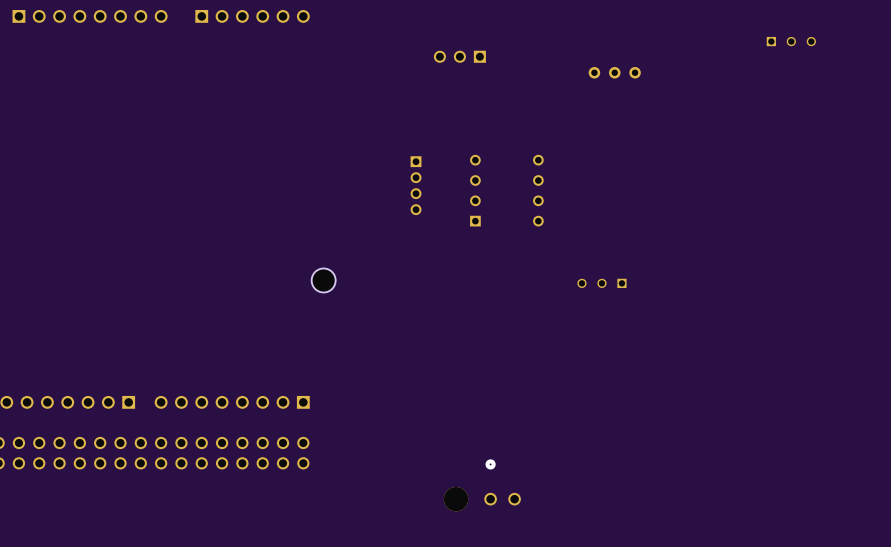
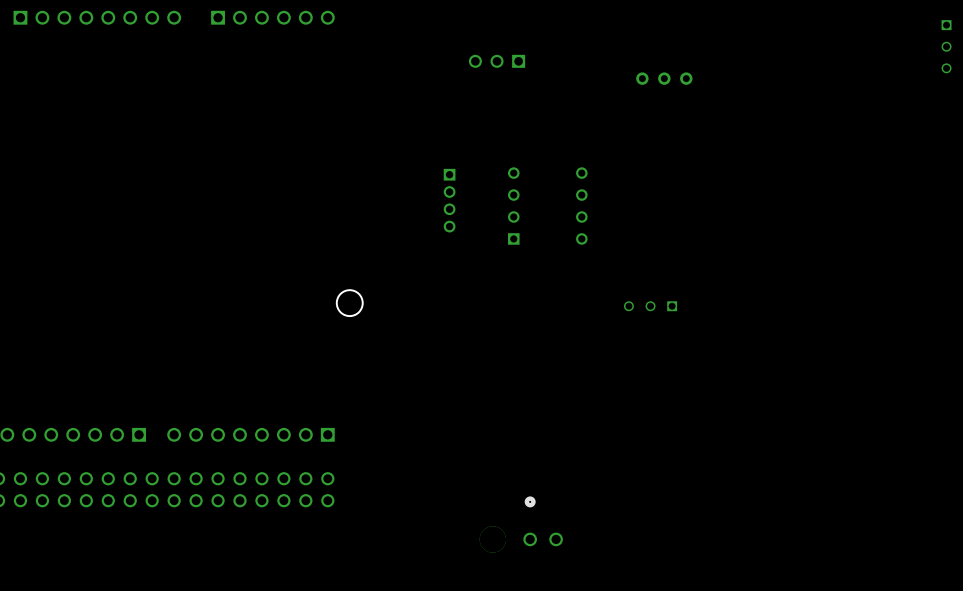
part rotation: 0° (791, 41) -> 90° clockwise (946, 46)
part position: (791, 41) -> (946, 46)

